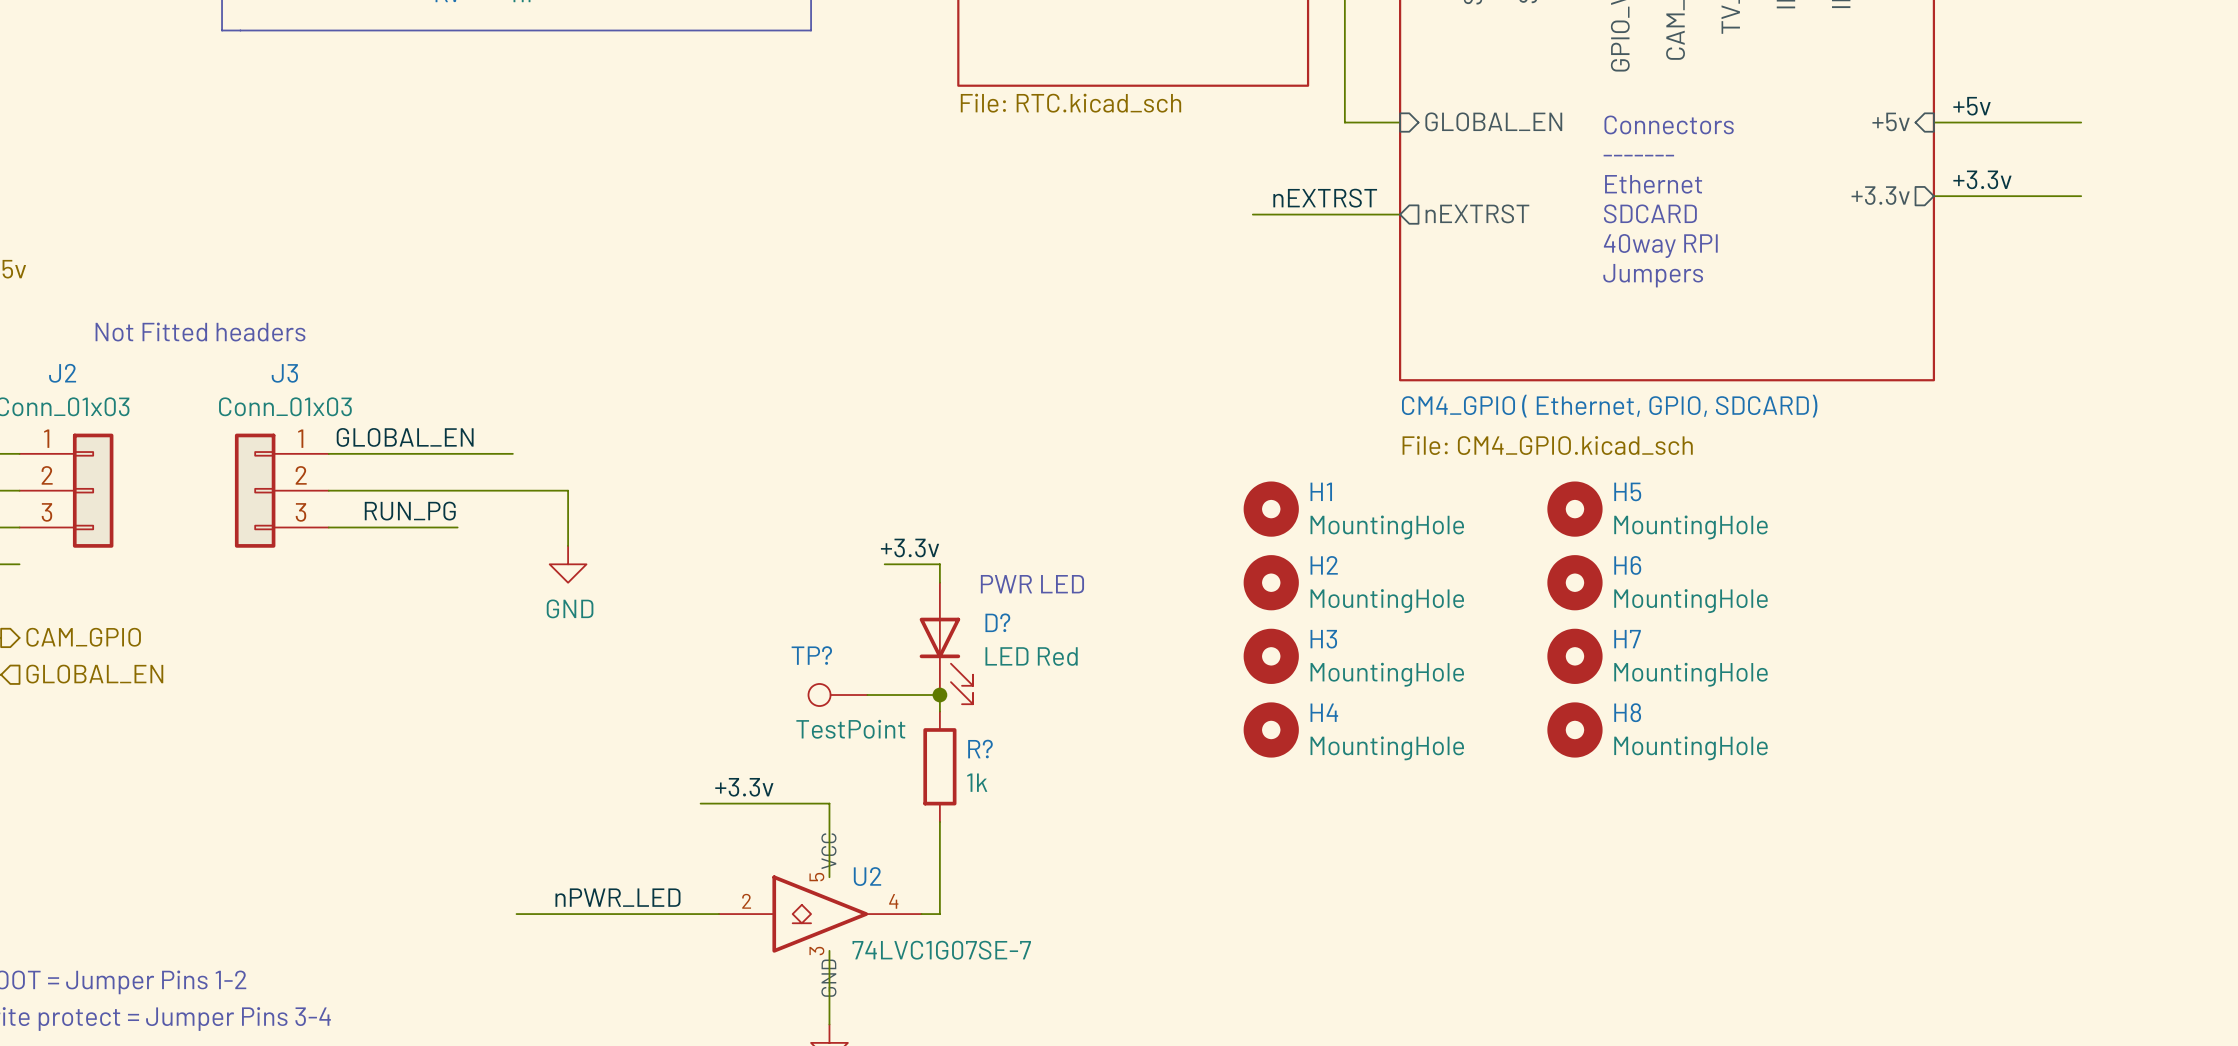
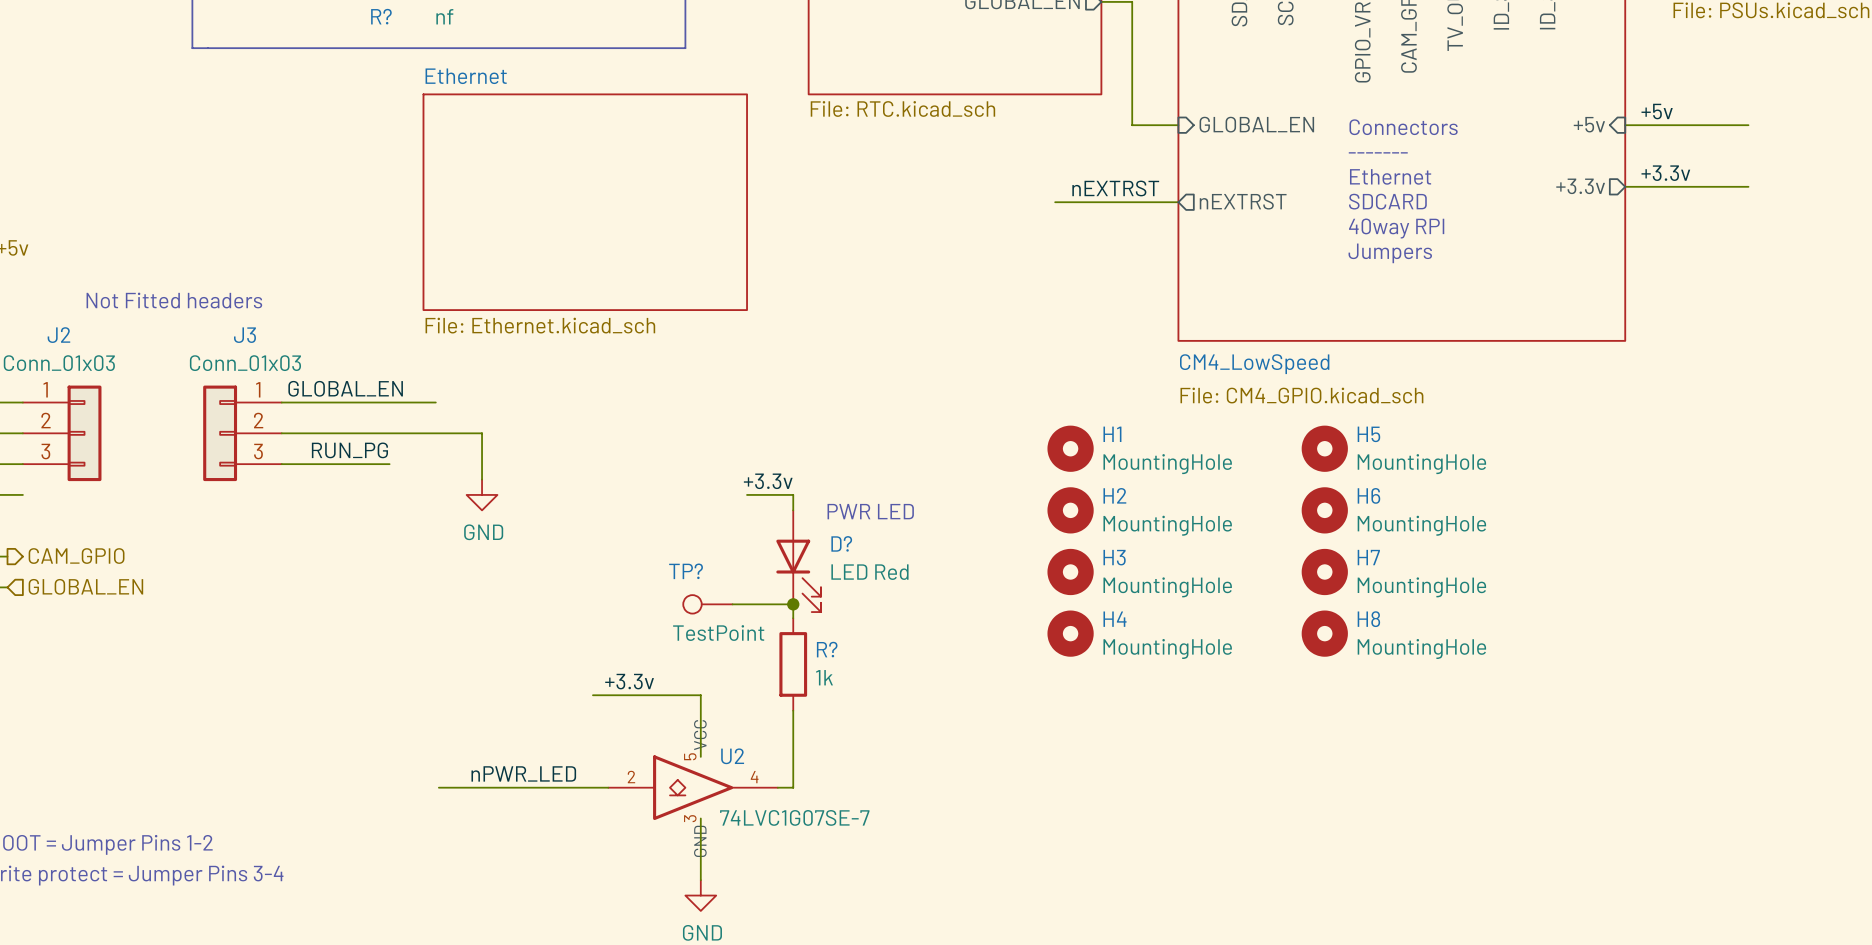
sheet Ethernet: none -> File: Ethernet.kicad_sch (585, 202)
sheet CM4_LowSpeed name: CM4_GPIO ( Ethernet, GPIO, SDCARD) (1609, 406) -> CM4_LowSpeed (1254, 364)

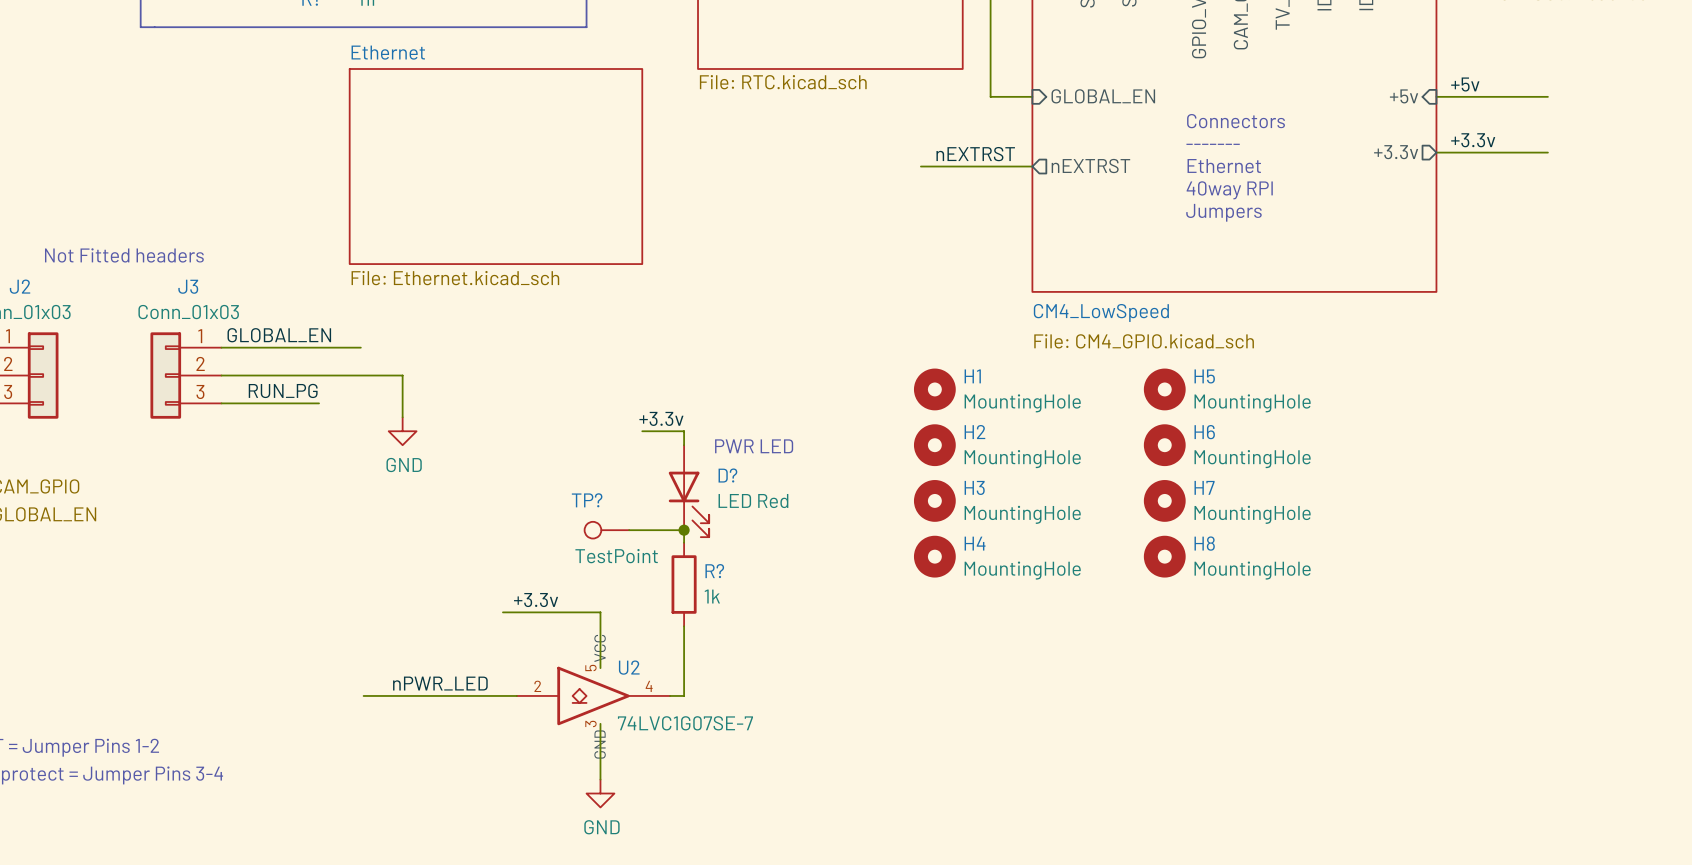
text: Connectors (1403, 127) -> none
text: ------- (1378, 152) -> Connectors (1236, 121)
text: Ethernet (1390, 176) -> ------- (1213, 144)
text: SDCARD (1387, 201) -> Ethernet (1224, 166)

